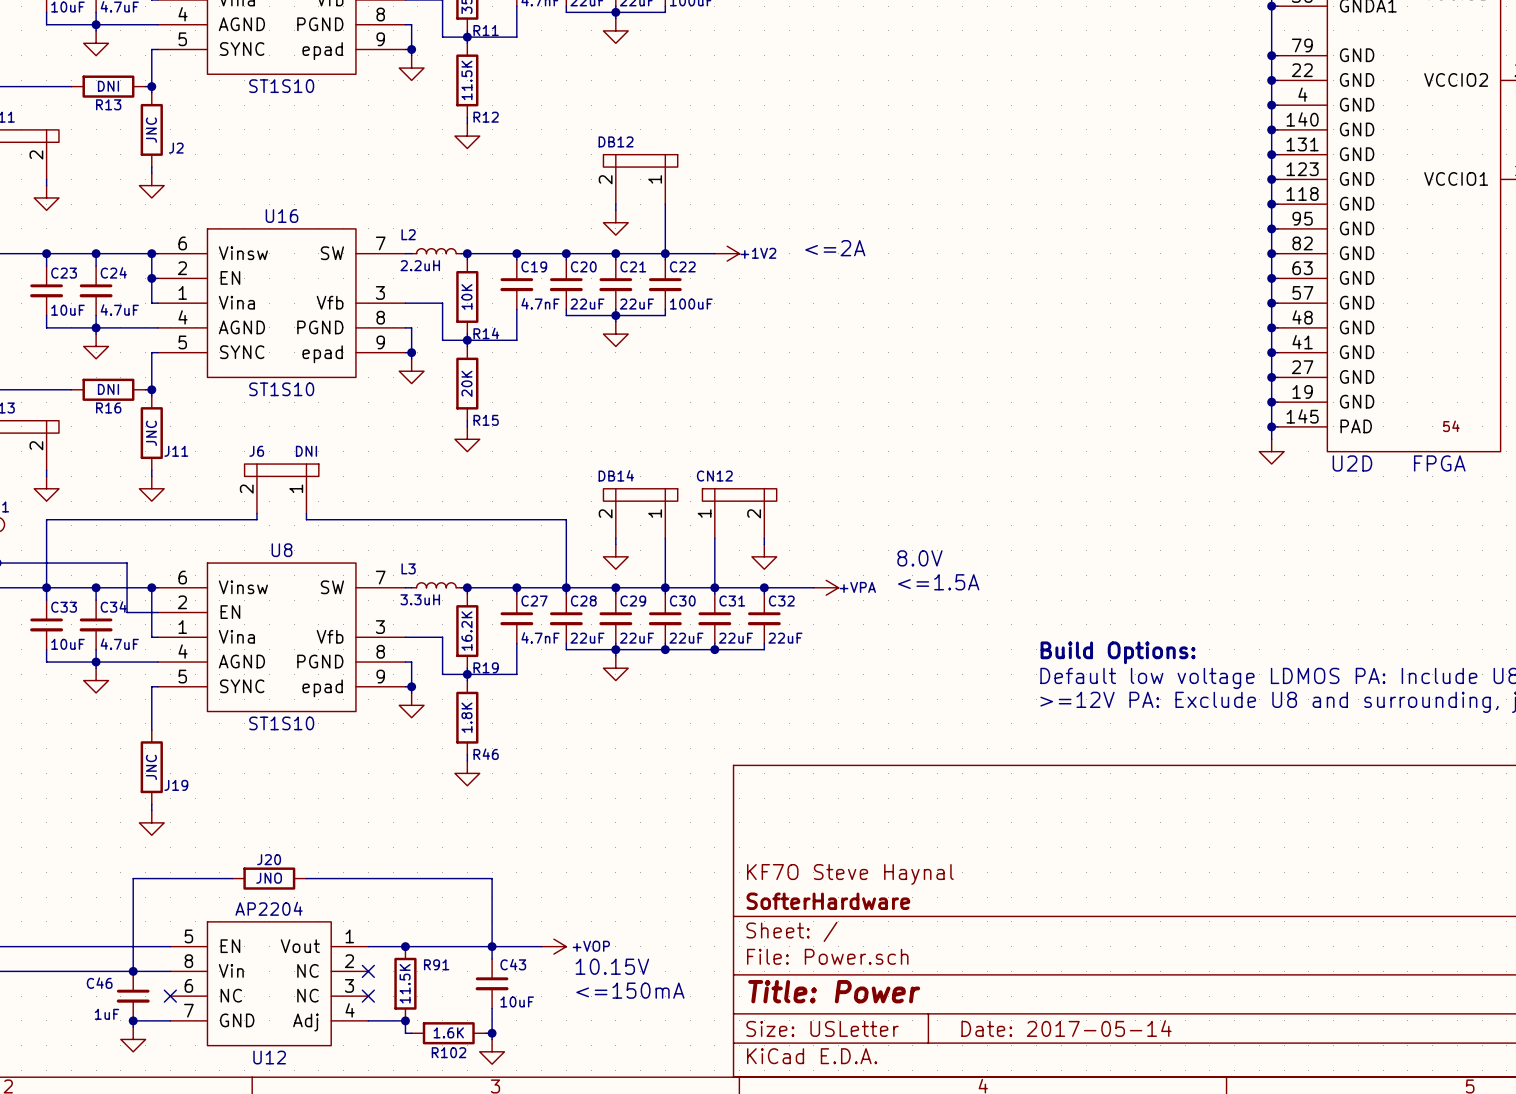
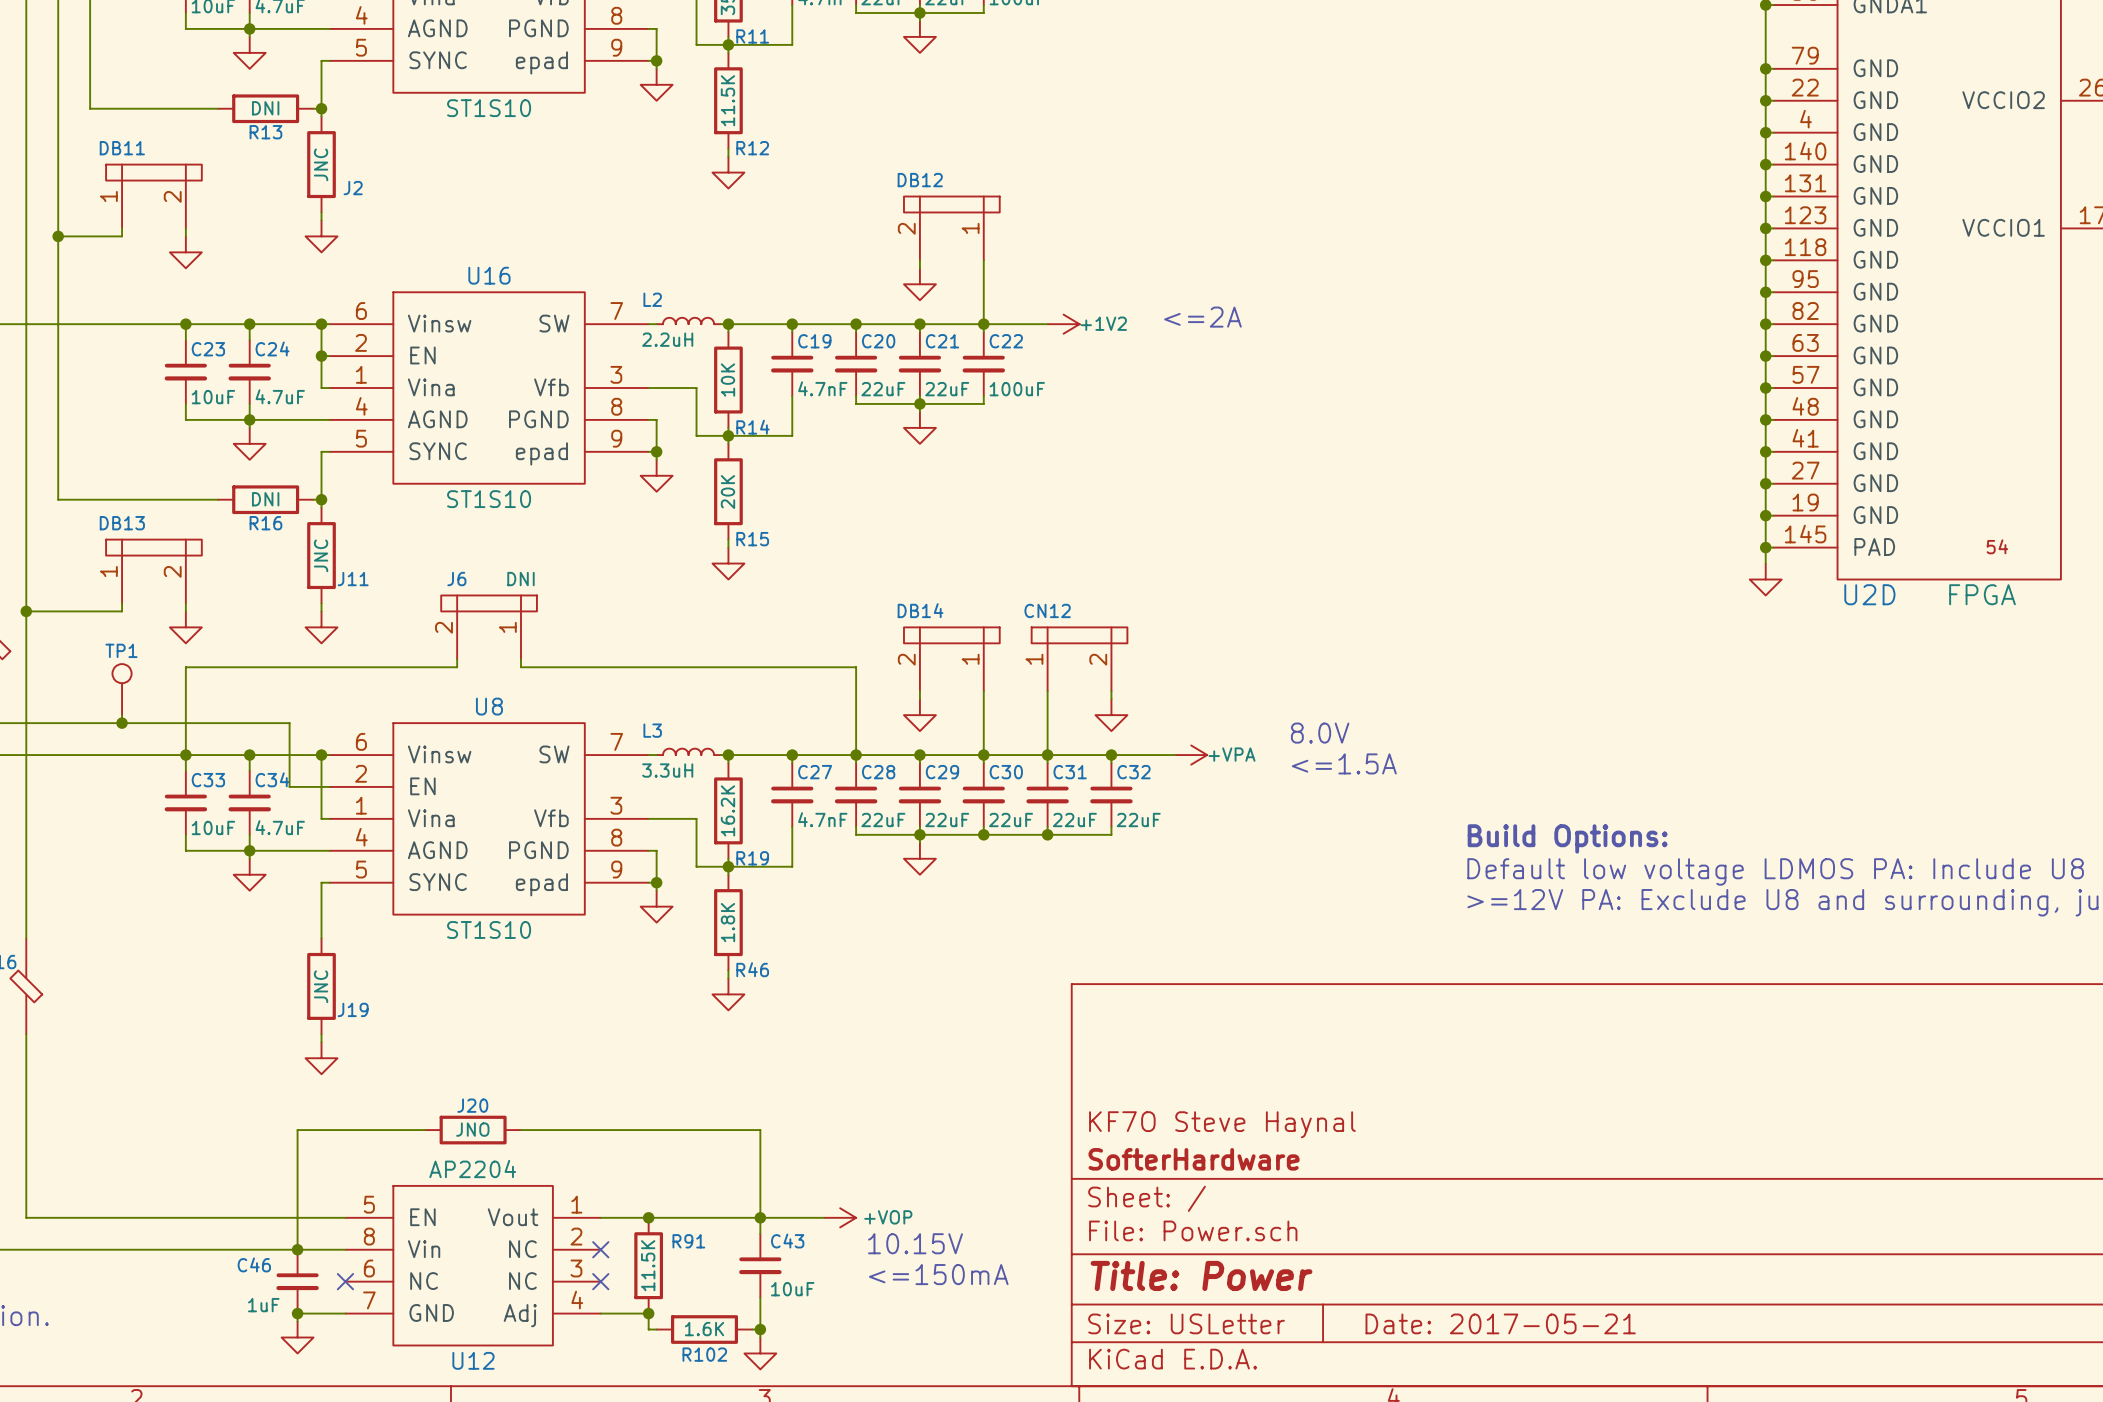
text position: 8.0V (919, 558) -> 8.0V (1320, 733)
text position: <=1.5A (938, 582) -> <=1.5A (1344, 763)
title block: Date: 2017-05-14 (1066, 1028) -> Date: 2017-05-21 (1500, 1323)

